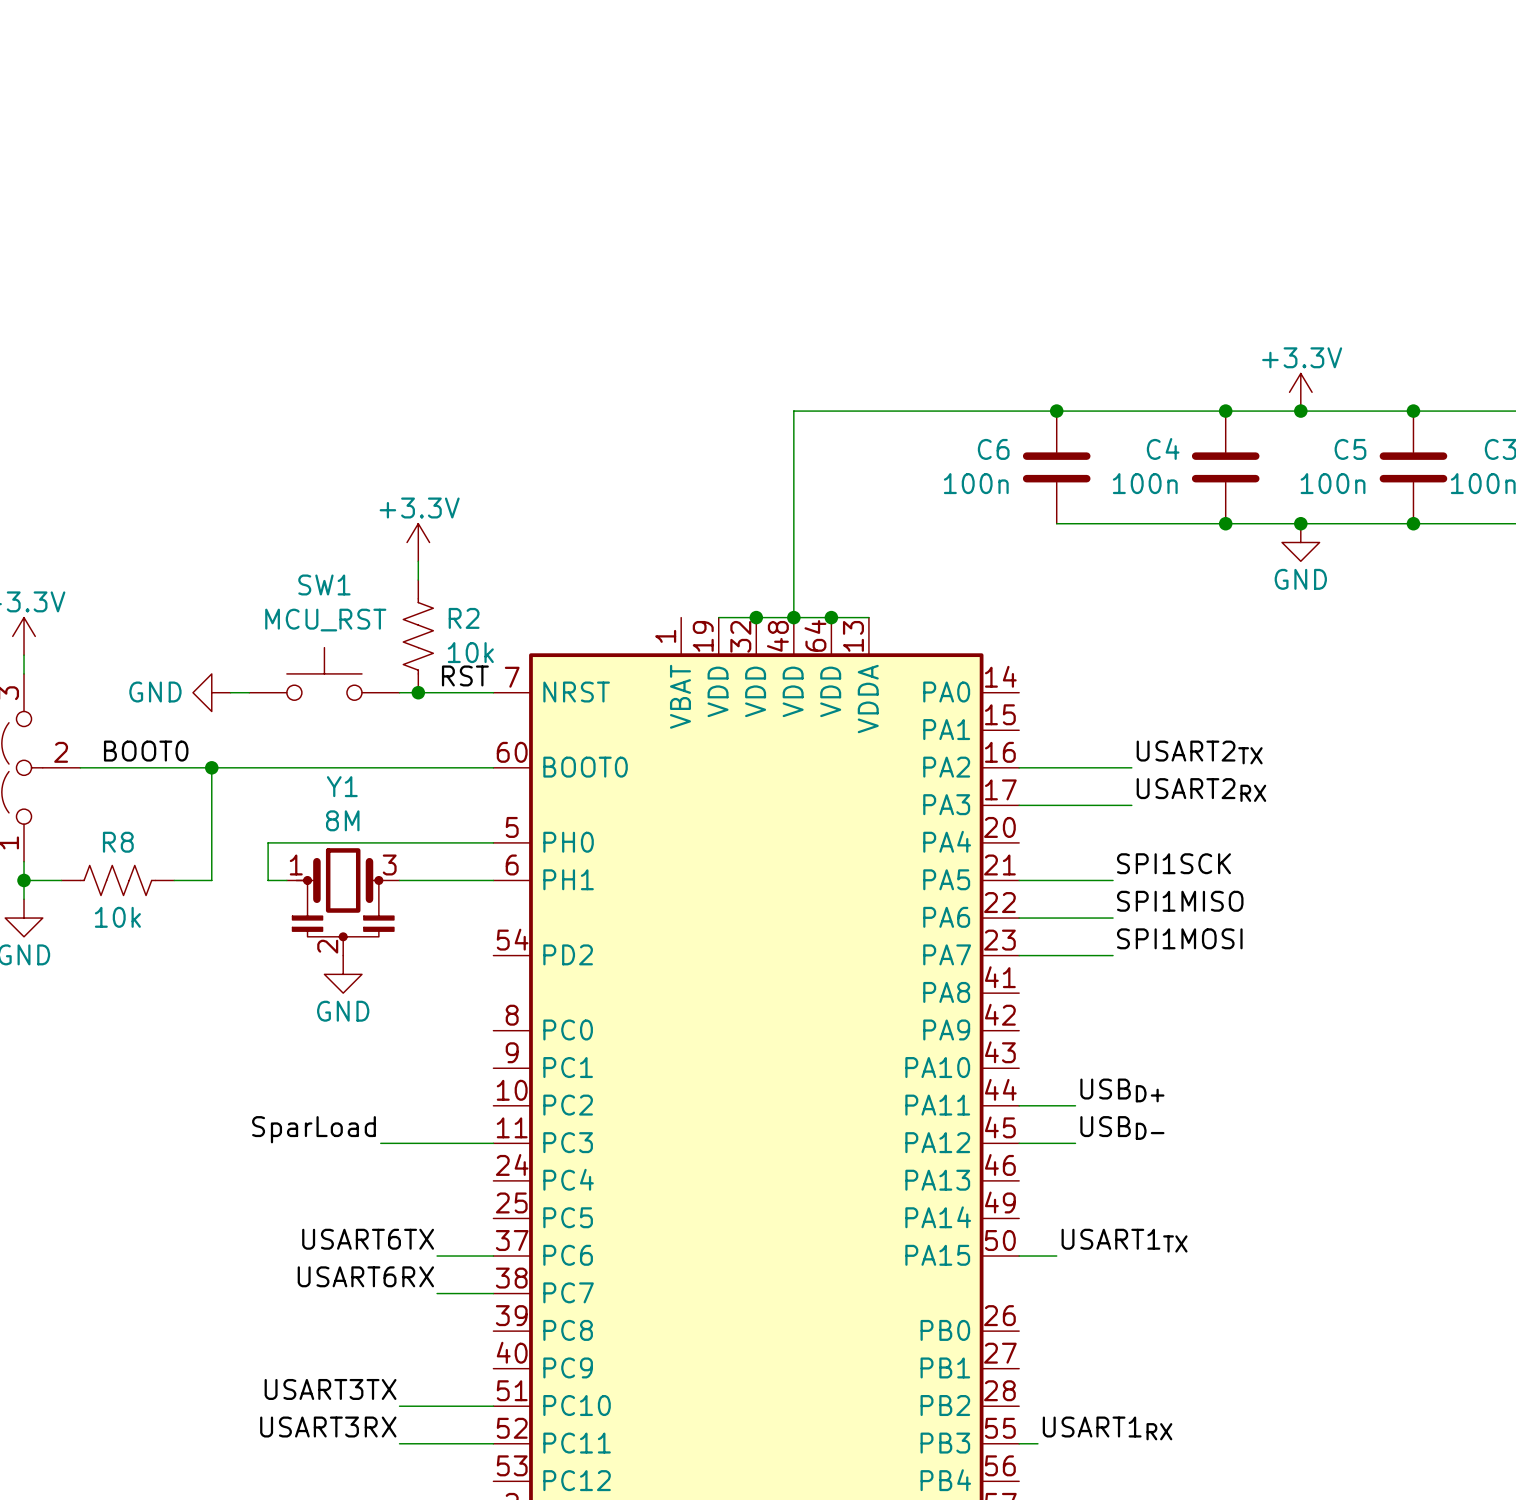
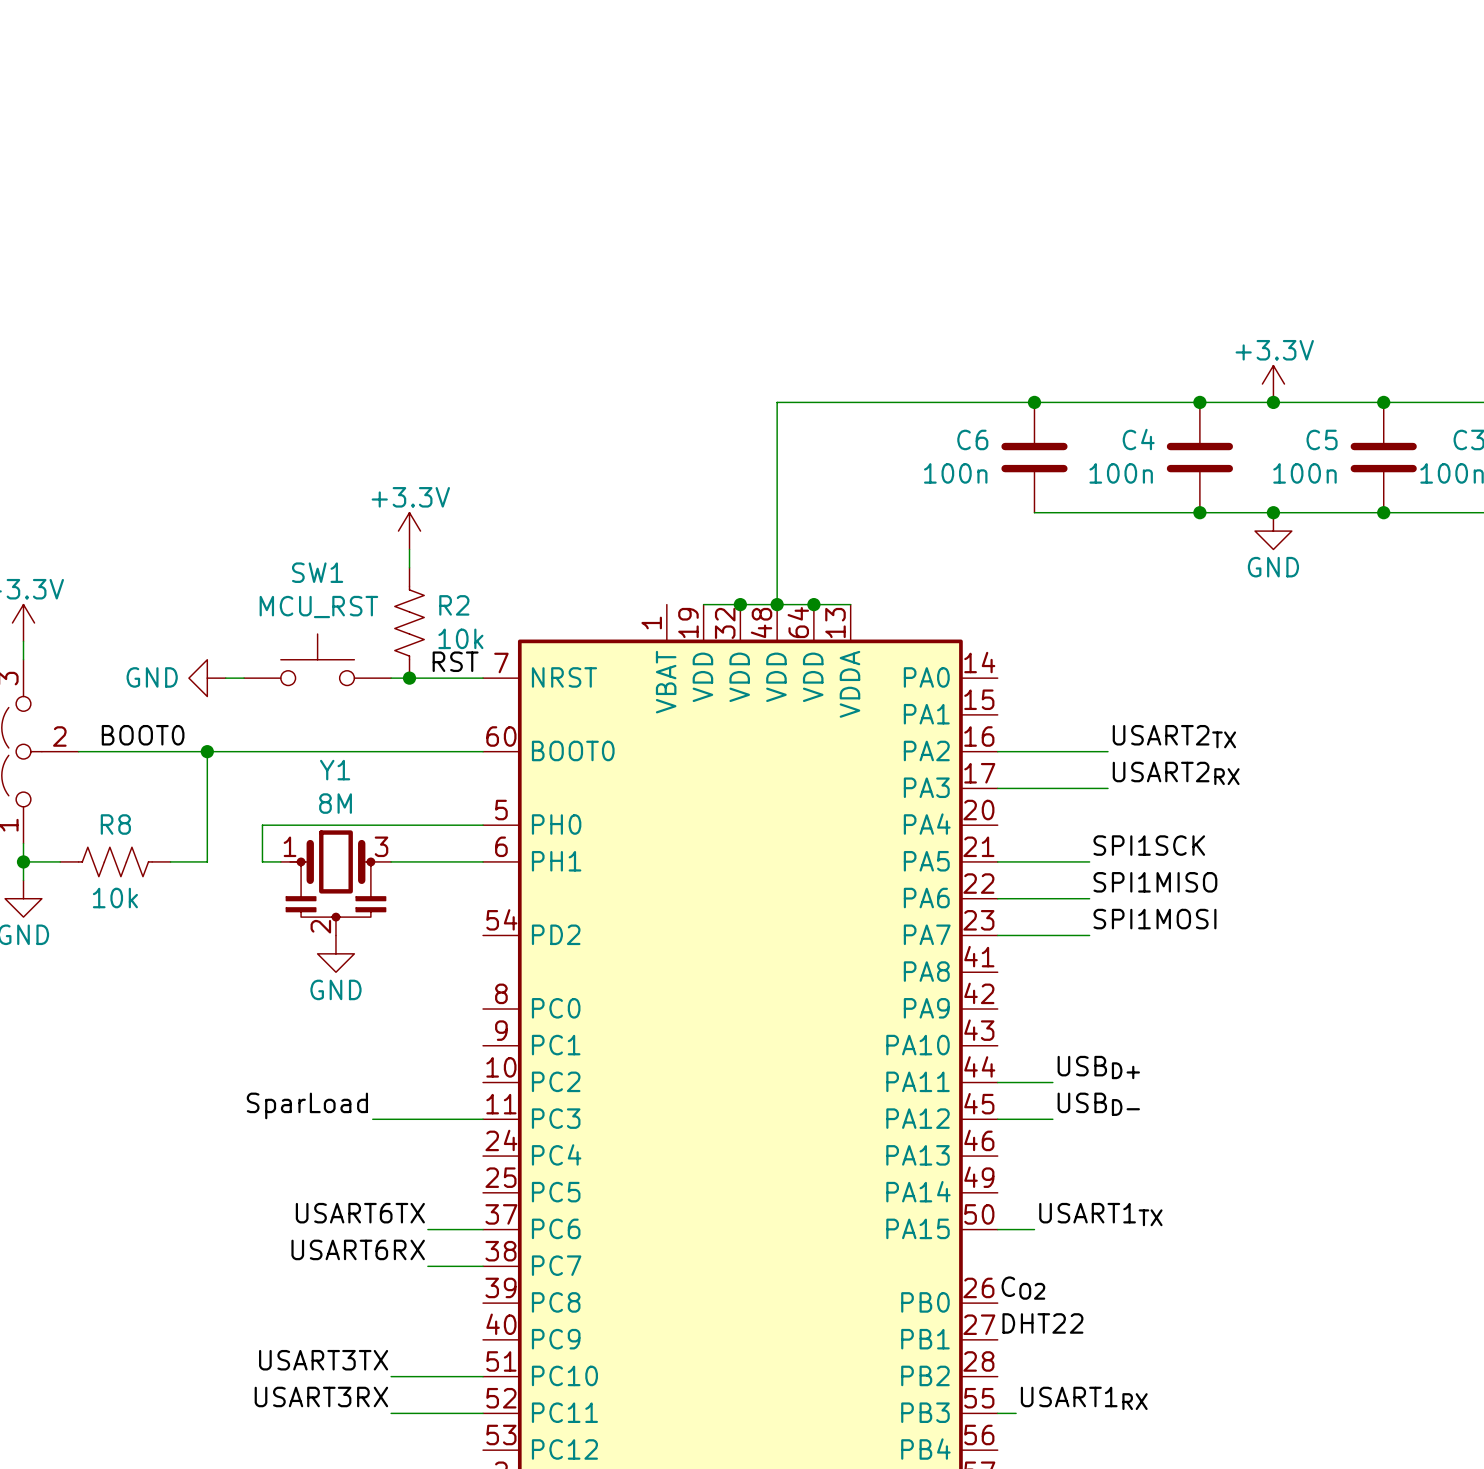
label: none -> CO2 (1023, 1288)
label: none -> DHT22 (1042, 1323)

